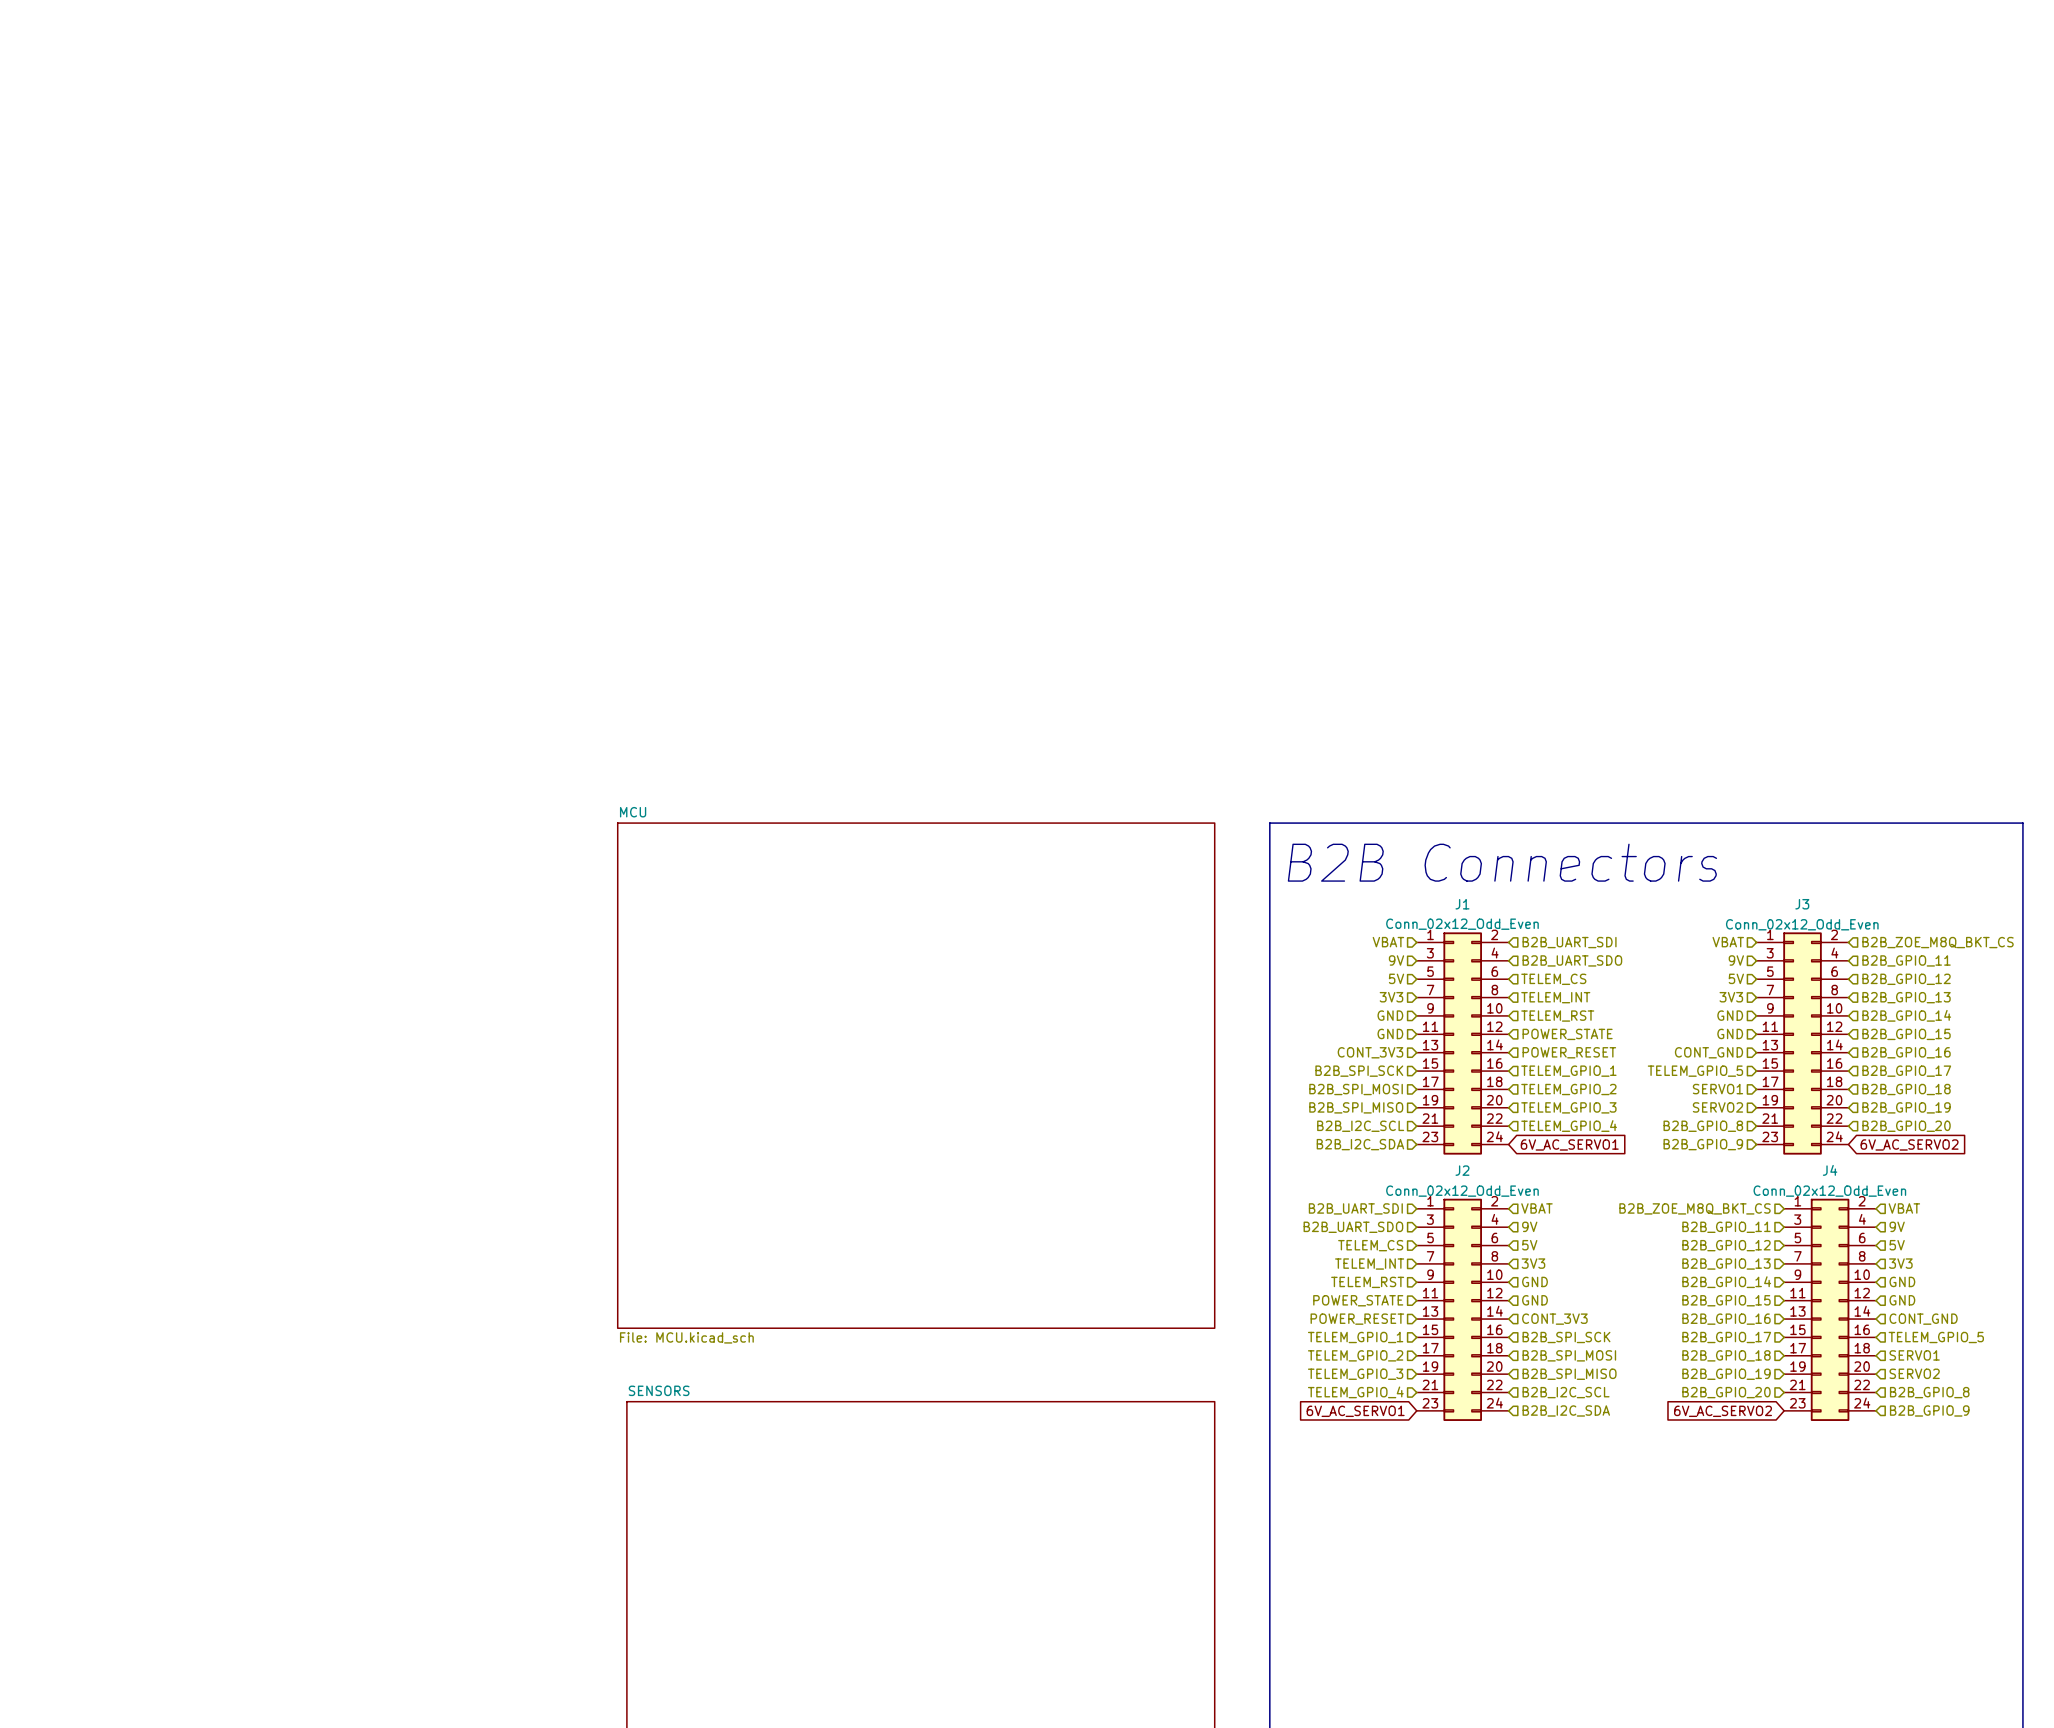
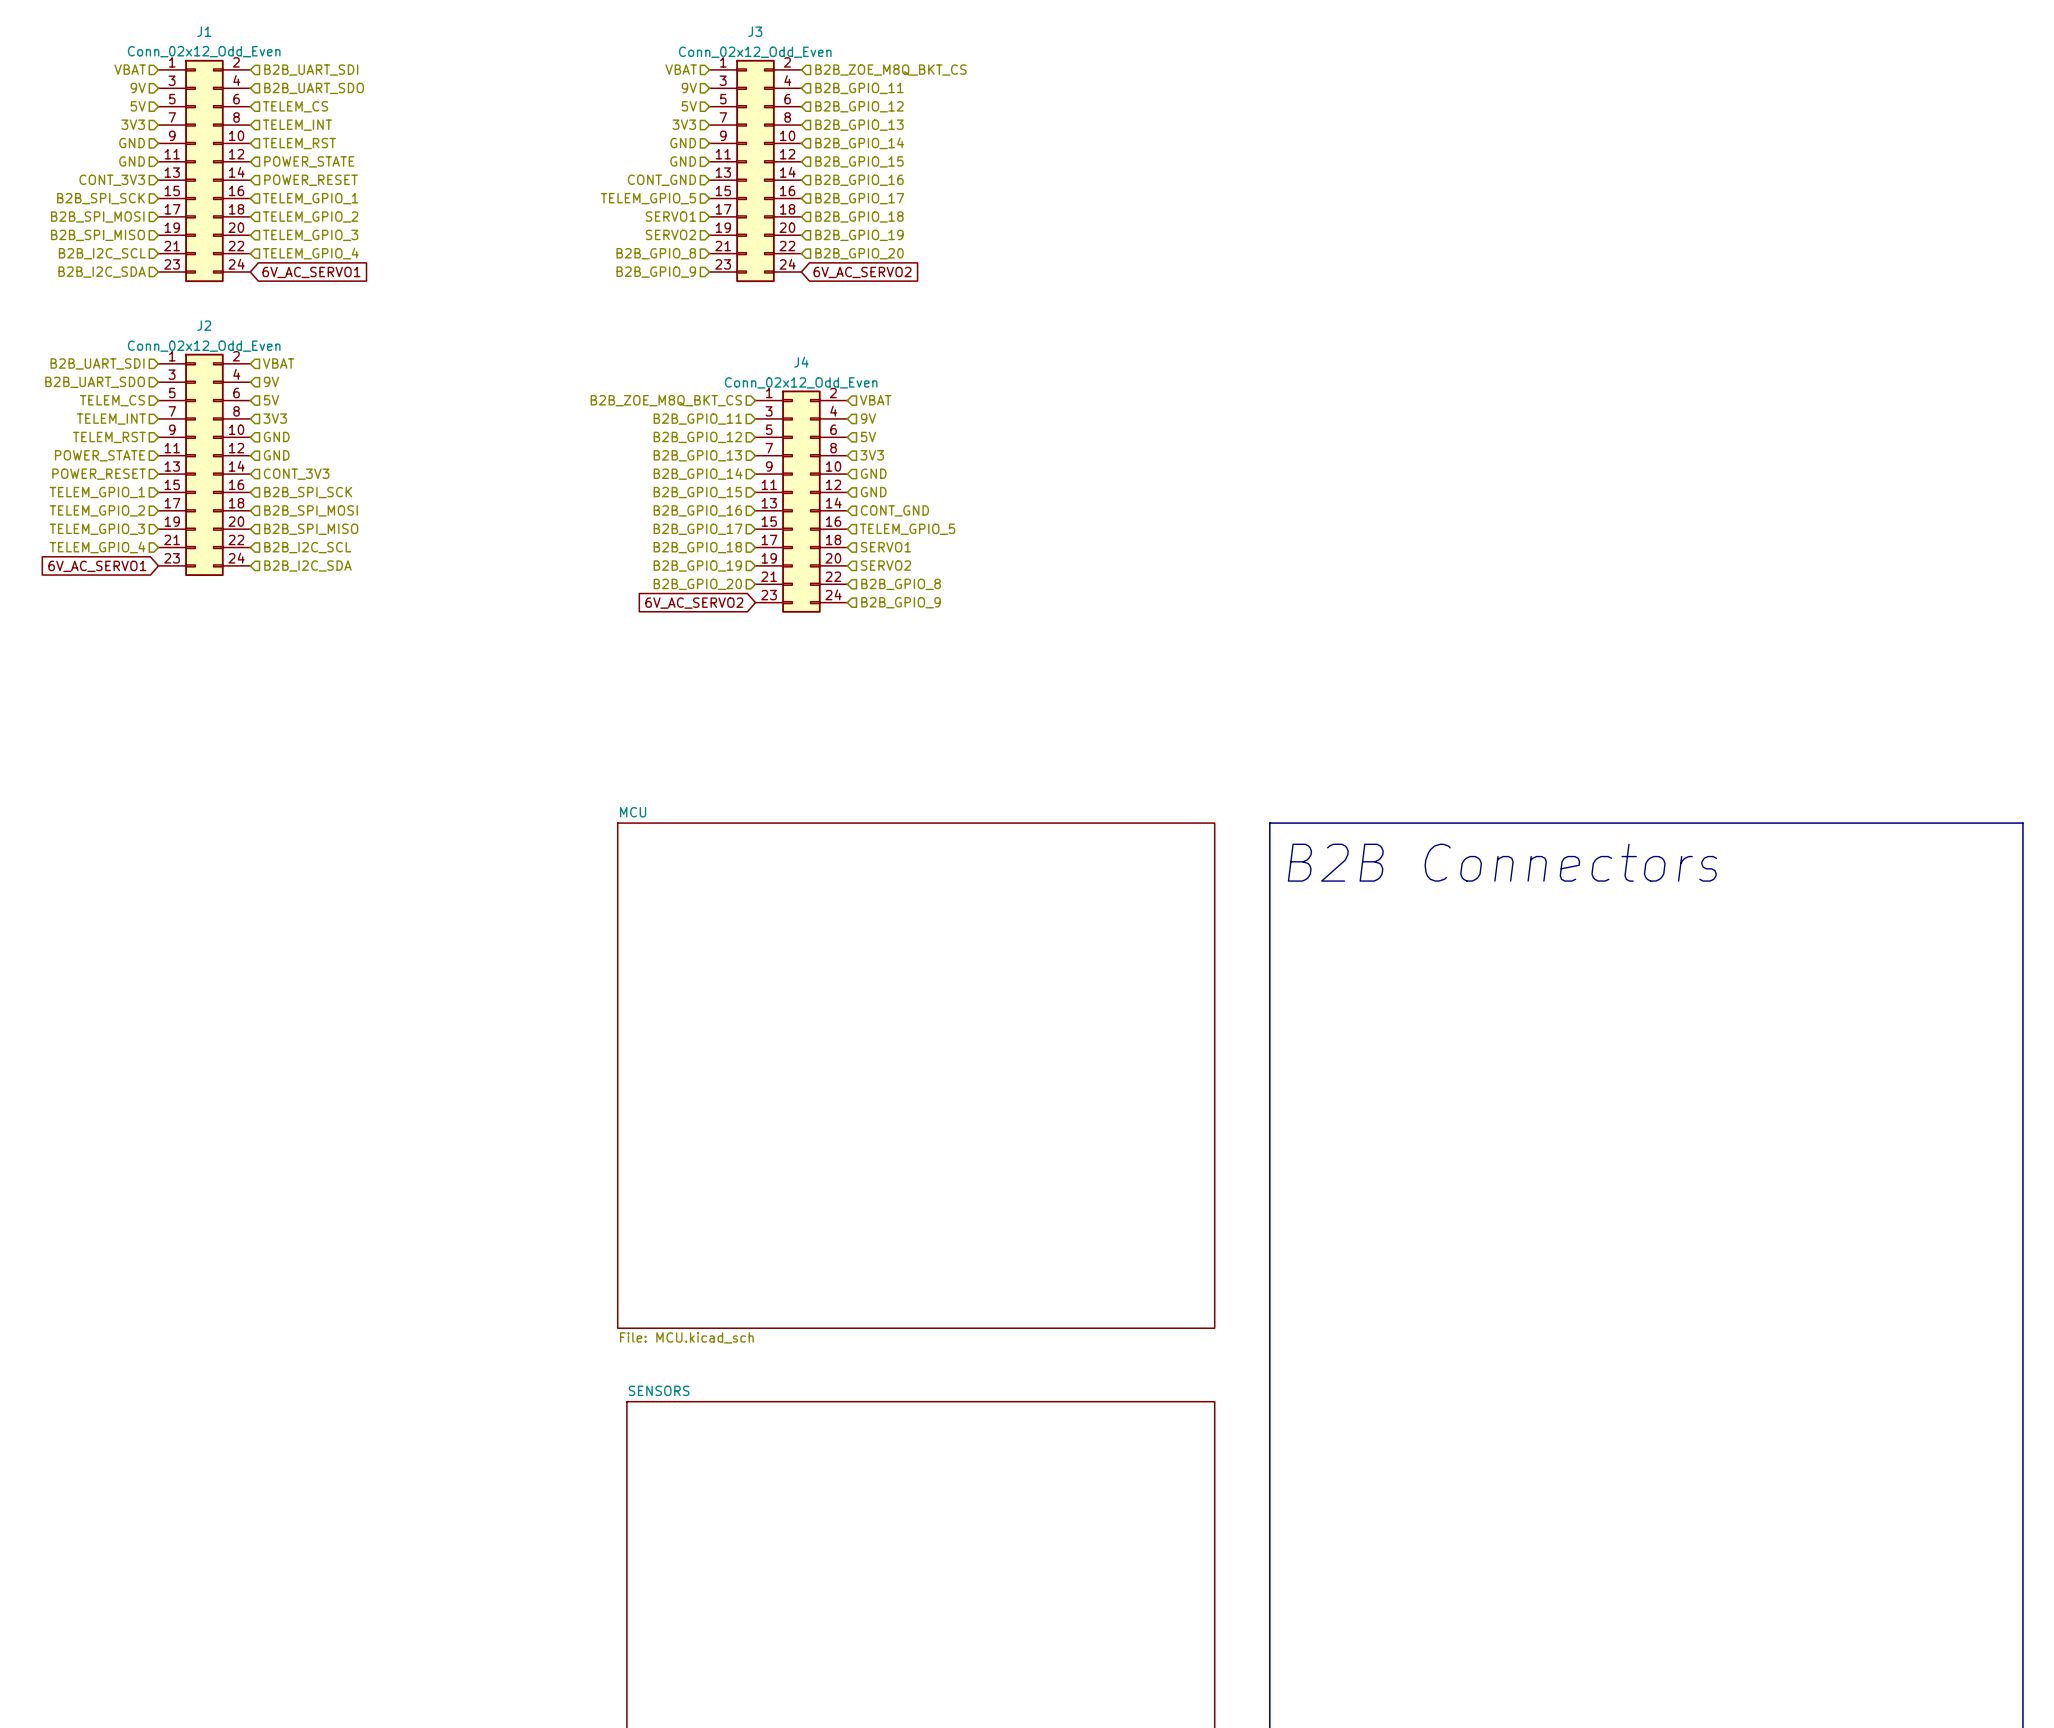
hierarchical label: none -> VBAT (130, 69)
hierarchical label: none -> VBAT (681, 69)
hierarchical label: none -> B2B_UART_SDI (311, 70)
hierarchical label: none -> B2B_ZOE_M8Q_BKT_CS (890, 70)
hierarchical label: none -> 9V (138, 87)
hierarchical label: none -> 9V (689, 87)
hierarchical label: none -> B2B_UART_SDO (314, 88)
hierarchical label: none -> B2B_GPIO_11 (859, 88)
hierarchical label: none -> 5V (138, 106)
hierarchical label: none -> TELEM_CS (295, 106)
hierarchical label: none -> 5V (689, 106)
hierarchical label: none -> B2B_GPIO_12 (859, 106)
hierarchical label: none -> 3V3 (133, 124)
hierarchical label: none -> 3V3 (684, 124)
hierarchical label: none -> TELEM_INT (297, 125)
hierarchical label: none -> B2B_GPIO_13 (859, 125)
hierarchical label: none -> GND (132, 143)
hierarchical label: none -> TELEM_RST (299, 143)
hierarchical label: none -> GND (683, 143)
hierarchical label: none -> B2B_GPIO_14 (859, 143)
hierarchical label: none -> GND (132, 161)
hierarchical label: none -> POWER_STATE (309, 161)
hierarchical label: none -> GND (683, 161)
hierarchical label: none -> B2B_GPIO_15 (859, 161)
hierarchical label: none -> CONT_3V3 (112, 180)
hierarchical label: none -> POWER_RESET (311, 180)
hierarchical label: none -> CONT_GND (661, 180)
hierarchical label: none -> B2B_GPIO_16 (859, 180)
hierarchical label: none -> B2B_SPI_SCK (101, 198)
hierarchical label: none -> TELEM_GPIO_1 (310, 198)
hierarchical label: none -> TELEM_GPIO_5 (648, 198)
hierarchical label: none -> B2B_GPIO_17 (859, 198)
hierarchical label: none -> B2B_SPI_MOSI (97, 216)
hierarchical label: none -> TELEM_GPIO_2 (310, 216)
hierarchical label: none -> SERVO1 (670, 216)
hierarchical label: none -> B2B_GPIO_18 (859, 216)
hierarchical label: none -> SERVO2 (670, 234)
hierarchical label: none -> B2B_SPI_MISO (97, 235)
hierarchical label: none -> TELEM_GPIO_3 (310, 235)
hierarchical label: none -> B2B_GPIO_19 (859, 235)
hierarchical label: none -> B2B_I2C_SCL (102, 253)
hierarchical label: none -> TELEM_GPIO_4 (310, 253)
hierarchical label: none -> B2B_GPIO_8 (656, 253)
hierarchical label: none -> B2B_GPIO_20 (859, 253)
hierarchical label: none -> B2B_I2C_SDA (102, 272)
global label: none -> 6V_AC_SERVO1 (311, 272)
hierarchical label: none -> B2B_GPIO_9 (656, 272)
global label: none -> 6V_AC_SERVO2 (862, 272)
hierarchical label: none -> B2B_UART_SDI (97, 363)
hierarchical label: none -> VBAT (278, 363)
hierarchical label: none -> 9V (271, 381)
hierarchical label: none -> B2B_UART_SDO (95, 382)
hierarchical label: none -> TELEM_CS (112, 400)
hierarchical label: none -> 5V (271, 400)
hierarchical label: none -> B2B_ZOE_M8Q_BKT_CS (666, 400)
hierarchical label: none -> VBAT (875, 400)
hierarchical label: none -> 3V3 (275, 418)
hierarchical label: none -> 9V (868, 418)
hierarchical label: none -> TELEM_INT (111, 419)
hierarchical label: none -> B2B_GPIO_11 (697, 419)
hierarchical label: none -> GND (276, 436)
hierarchical label: none -> 5V (868, 436)
hierarchical label: none -> TELEM_RST (109, 437)
hierarchical label: none -> B2B_GPIO_12 (697, 437)
hierarchical label: none -> POWER_STATE (99, 455)
hierarchical label: none -> GND (276, 455)
hierarchical label: none -> B2B_GPIO_13 (697, 455)
hierarchical label: none -> 3V3 (872, 455)
hierarchical label: none -> B2B_GPIO_14 (698, 473)
hierarchical label: none -> GND (873, 473)
hierarchical label: none -> POWER_RESET (99, 474)
hierarchical label: none -> CONT_3V3 (296, 474)
hierarchical label: none -> TELEM_GPIO_1 (97, 492)
hierarchical label: none -> B2B_SPI_SCK (308, 492)
hierarchical label: none -> B2B_GPIO_15 (697, 492)
hierarchical label: none -> GND (873, 492)
hierarchical label: none -> TELEM_GPIO_2 (97, 510)
hierarchical label: none -> B2B_SPI_MOSI (311, 510)
hierarchical label: none -> B2B_GPIO_16 (697, 510)
hierarchical label: none -> CONT_GND (894, 510)
hierarchical label: none -> TELEM_GPIO_3 (97, 529)
hierarchical label: none -> B2B_SPI_MISO (311, 529)
hierarchical label: none -> B2B_GPIO_17 (698, 529)
hierarchical label: none -> TELEM_GPIO_5 (907, 529)
hierarchical label: none -> TELEM_GPIO_4 (97, 547)
hierarchical label: none -> B2B_I2C_SCL (307, 547)
hierarchical label: none -> B2B_GPIO_18 (697, 547)
hierarchical label: none -> SERVO1 (885, 547)
hierarchical label: none -> SERVO2 (885, 565)
global label: none -> 6V_AC_SERVO1 (97, 566)
hierarchical label: none -> B2B_I2C_SDA (307, 566)
hierarchical label: none -> B2B_GPIO_19 (697, 566)
hierarchical label: none -> B2B_GPIO_20 (697, 584)
hierarchical label: none -> B2B_GPIO_8 (901, 584)
hierarchical label: none -> B2B_GPIO_9 (901, 602)
global label: none -> 6V_AC_SERVO2 (694, 603)
hierarchical label: VBAT (1388, 942) -> none
hierarchical label: B2B_UART_SDI (1569, 942) -> none
hierarchical label: VBAT (1728, 942) -> none
hierarchical label: B2B_ZOE_M8Q_BKT_CS (1938, 942) -> none
hierarchical label: 9V (1396, 960) -> none
hierarchical label: B2B_UART_SDO (1572, 960) -> none
hierarchical label: 9V (1736, 960) -> none
hierarchical label: B2B_GPIO_11 (1906, 960) -> none
hierarchical label: 5V (1396, 978) -> none
hierarchical label: 5V (1736, 978) -> none
hierarchical label: TELEM_CS (1553, 979) -> none
hierarchical label: B2B_GPIO_12 (1906, 979) -> none
hierarchical label: 3V3 (1391, 997) -> none
hierarchical label: TELEM_INT (1555, 997) -> none
hierarchical label: 3V3 (1731, 997) -> none
hierarchical label: B2B_GPIO_13 (1906, 997) -> none
hierarchical label: GND (1390, 1015) -> none
hierarchical label: GND (1730, 1015) -> none
hierarchical label: B2B_GPIO_14 (1906, 1015) -> none
hierarchical label: TELEM_RST (1557, 1016) -> none
hierarchical label: GND (1390, 1033) -> none
hierarchical label: GND (1730, 1033) -> none
hierarchical label: POWER_STATE (1567, 1034) -> none
hierarchical label: B2B_GPIO_15 (1906, 1034) -> none
J1 position: (1462, 1043) -> (204, 170)
J3 position: (1802, 1043) -> (755, 170)
hierarchical label: CONT_3V3 (1370, 1052) -> none
hierarchical label: POWER_RESET (1569, 1052) -> none
hierarchical label: CONT_GND (1709, 1052) -> none
hierarchical label: B2B_GPIO_16 (1906, 1052) -> none
hierarchical label: B2B_SPI_SCK (1359, 1071) -> none
hierarchical label: TELEM_GPIO_1 (1568, 1071) -> none
hierarchical label: TELEM_GPIO_5 (1695, 1071) -> none
hierarchical label: B2B_GPIO_17 (1906, 1071) -> none
hierarchical label: B2B_SPI_MOSI (1356, 1089) -> none
hierarchical label: TELEM_GPIO_2 (1568, 1089) -> none
hierarchical label: SERVO1 (1717, 1089) -> none
hierarchical label: B2B_GPIO_18 (1906, 1089) -> none
hierarchical label: B2B_SPI_MISO (1356, 1107) -> none
hierarchical label: TELEM_GPIO_3 (1568, 1107) -> none
hierarchical label: SERVO2 (1717, 1107) -> none
hierarchical label: B2B_GPIO_19 (1906, 1107) -> none
hierarchical label: B2B_I2C_SCL (1360, 1126) -> none
hierarchical label: TELEM_GPIO_4 (1569, 1126) -> none
hierarchical label: B2B_GPIO_8 (1703, 1126) -> none
hierarchical label: B2B_GPIO_20 (1906, 1126) -> none
hierarchical label: B2B_I2C_SDA (1360, 1144) -> none
global label: 6V_AC_SERVO1 (1569, 1144) -> none
hierarchical label: B2B_GPIO_9 (1703, 1144) -> none
global label: 6V_AC_SERVO2 (1909, 1144) -> none
hierarchical label: B2B_UART_SDI (1355, 1208) -> none
hierarchical label: VBAT (1536, 1208) -> none
hierarchical label: B2B_ZOE_M8Q_BKT_CS (1695, 1208) -> none
hierarchical label: VBAT (1904, 1208) -> none
hierarchical label: 9V (1529, 1226) -> none
hierarchical label: 9V (1897, 1226) -> none
hierarchical label: B2B_UART_SDO (1353, 1227) -> none
hierarchical label: B2B_GPIO_11 (1726, 1227) -> none
hierarchical label: TELEM_CS (1370, 1245) -> none
hierarchical label: 5V (1529, 1245) -> none
hierarchical label: B2B_GPIO_12 (1726, 1245) -> none
hierarchical label: 5V (1897, 1245) -> none
hierarchical label: 3V3 (1533, 1263) -> none
hierarchical label: 3V3 (1900, 1263) -> none
hierarchical label: TELEM_INT (1369, 1264) -> none
hierarchical label: B2B_GPIO_13 (1726, 1264) -> none
hierarchical label: GND (1535, 1281) -> none
hierarchical label: GND (1902, 1281) -> none
hierarchical label: TELEM_RST (1367, 1282) -> none
hierarchical label: B2B_GPIO_14 (1726, 1282) -> none
hierarchical label: POWER_STATE (1358, 1300) -> none
hierarchical label: GND (1535, 1300) -> none
hierarchical label: B2B_GPIO_15 (1726, 1300) -> none
hierarchical label: GND (1902, 1300) -> none
J2 position: (1462, 1309) -> (204, 464)
J4 position: (1830, 1309) -> (801, 501)
hierarchical label: POWER_RESET (1357, 1319) -> none
hierarchical label: CONT_3V3 (1554, 1319) -> none
hierarchical label: B2B_GPIO_16 (1726, 1319) -> none
hierarchical label: CONT_GND (1923, 1319) -> none
hierarchical label: TELEM_GPIO_1 (1355, 1337) -> none
hierarchical label: B2B_SPI_SCK (1566, 1337) -> none
hierarchical label: B2B_GPIO_17 (1726, 1337) -> none
hierarchical label: TELEM_GPIO_5 (1936, 1337) -> none
hierarchical label: TELEM_GPIO_2 (1355, 1355) -> none
hierarchical label: B2B_SPI_MOSI (1569, 1355) -> none
hierarchical label: B2B_GPIO_18 (1726, 1355) -> none
hierarchical label: SERVO1 (1914, 1355) -> none
hierarchical label: SERVO2 (1914, 1373) -> none
hierarchical label: TELEM_GPIO_3 (1355, 1374) -> none
hierarchical label: B2B_SPI_MISO (1569, 1374) -> none
hierarchical label: B2B_GPIO_19 (1726, 1374) -> none
hierarchical label: TELEM_GPIO_4 (1355, 1392) -> none
hierarchical label: B2B_I2C_SCL (1566, 1392) -> none
hierarchical label: B2B_GPIO_20 (1726, 1392) -> none
hierarchical label: B2B_GPIO_8 (1929, 1392) -> none
hierarchical label: B2B_I2C_SDA (1566, 1410) -> none
hierarchical label: B2B_GPIO_9 (1929, 1410) -> none
global label: 6V_AC_SERVO1 (1355, 1411) -> none
global label: 6V_AC_SERVO2 (1723, 1411) -> none

